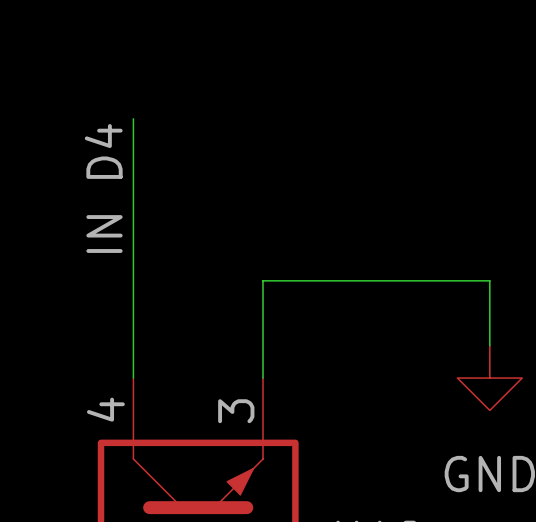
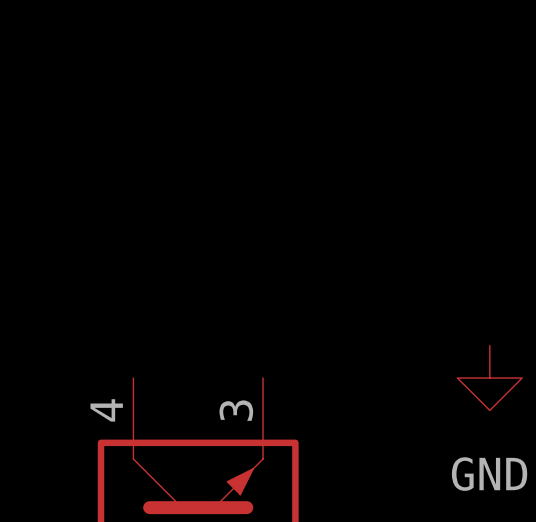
wire: (133, 118) (133, 378) -> none
label: IN D4 (103, 188) -> none
wire: (489, 345) (489, 280) (263, 280) (263, 378) -> none

